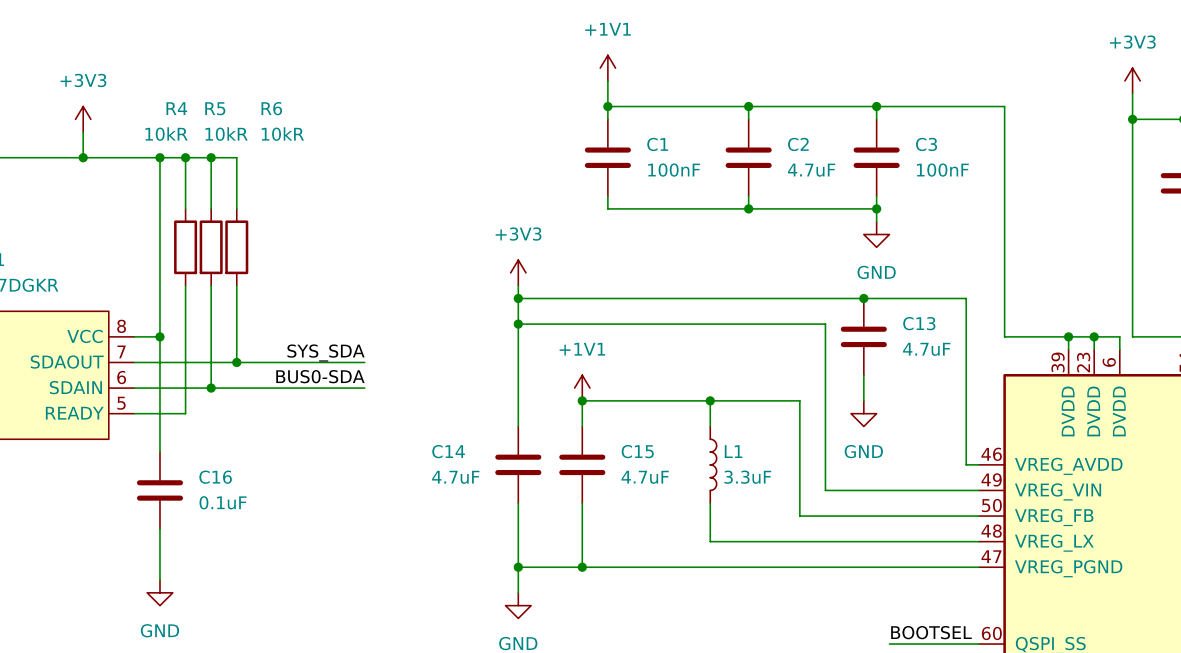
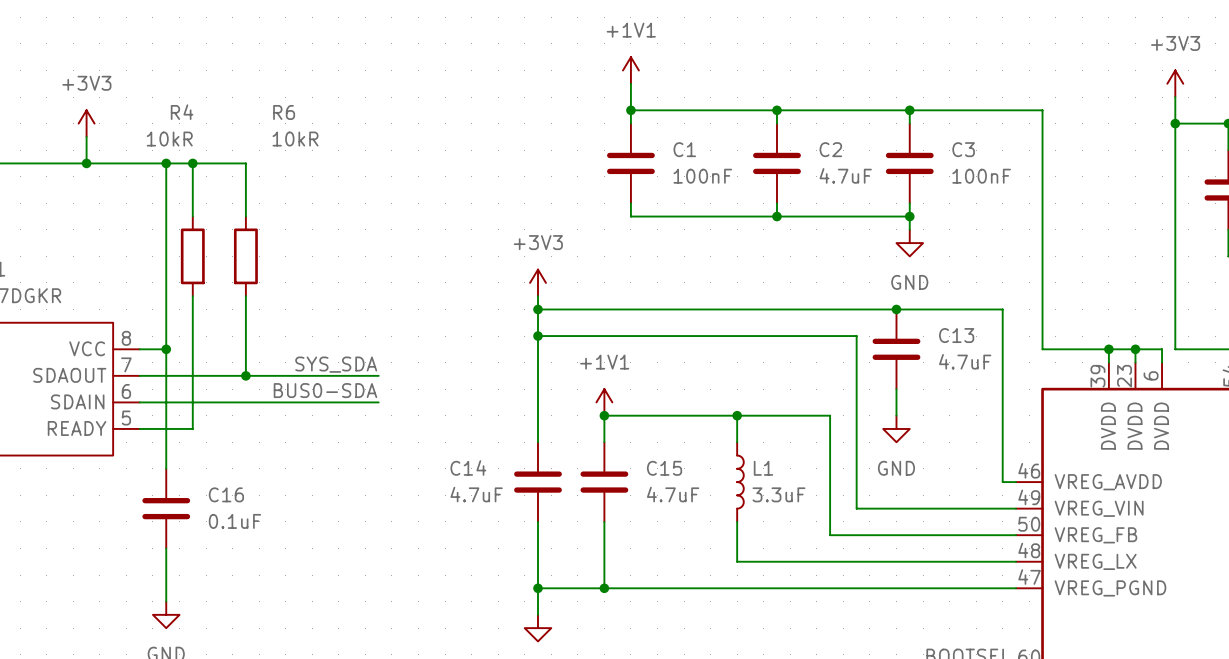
wire: (211, 157) (211, 208) -> none
junction: (211, 157) -> none
R5: 10kR (211, 247) -> none
wire: (211, 285) (211, 388) -> none
junction: (211, 388) -> none

